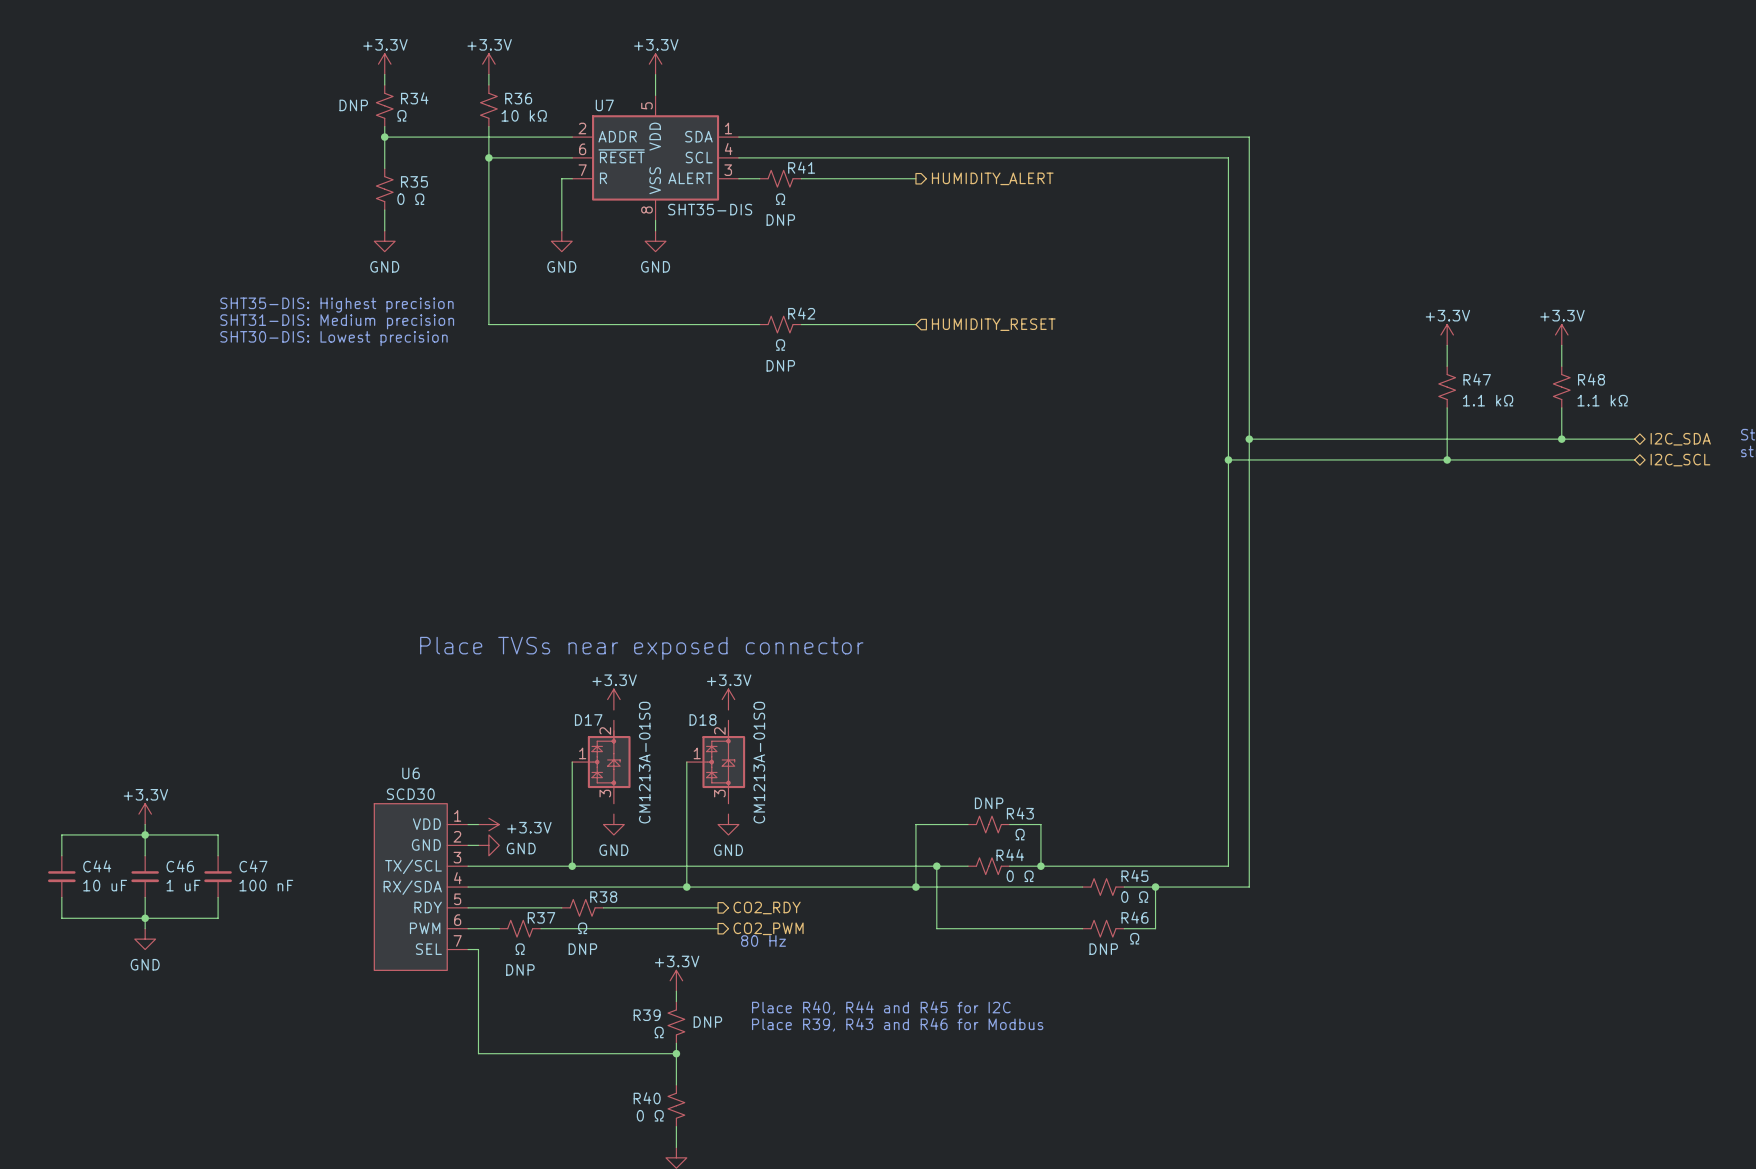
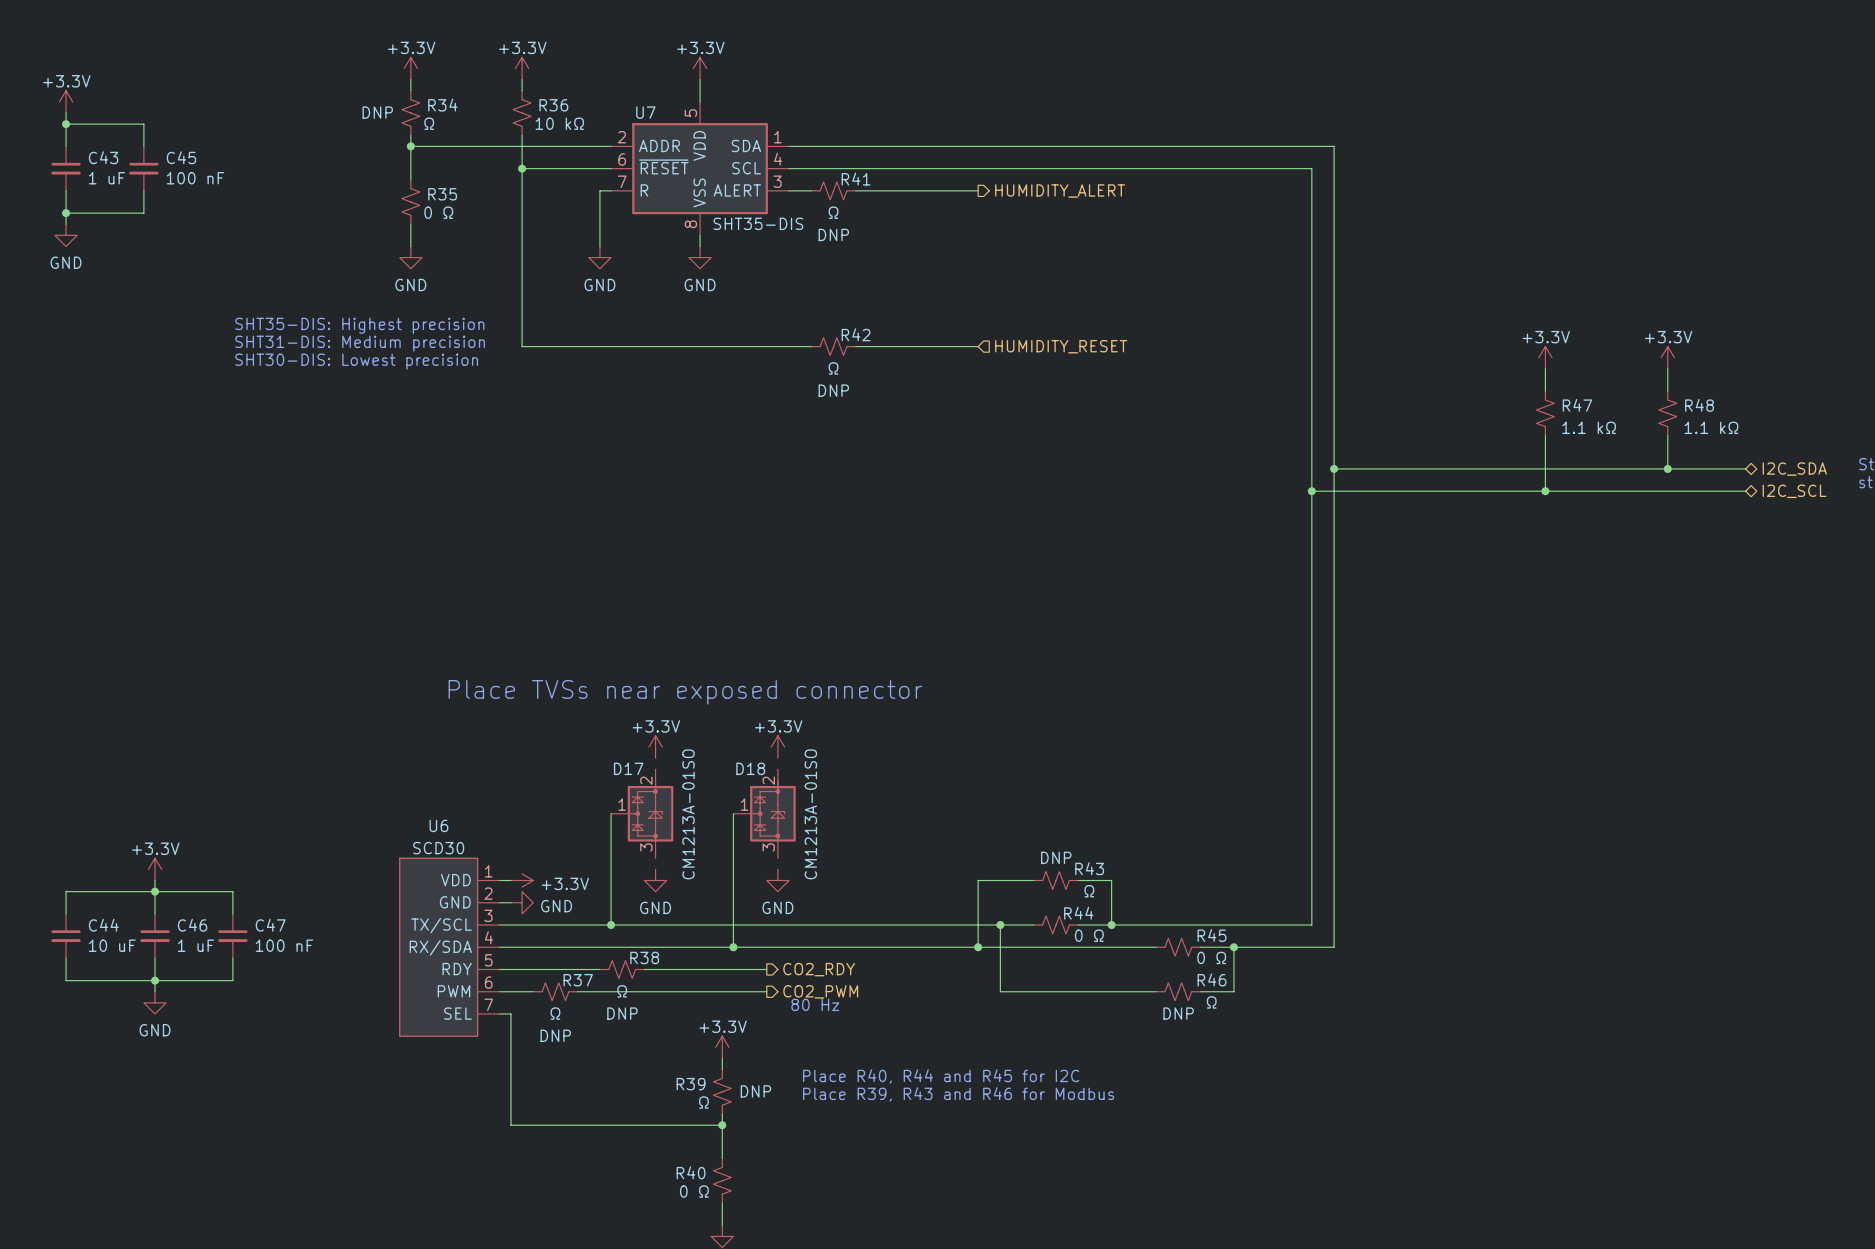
power symbol: none -> +3.3V (66, 101)
wire: none -> (66, 113) (66, 146)
wire: none -> (66, 124) (143, 124) (143, 146)
junction: none -> (66, 124)
C43: none -> 1 uF (66, 168)
C45: none -> 100 nF (143, 168)
wire: none -> (66, 190) (66, 224)
wire: none -> (143, 190) (143, 213) (66, 213)
junction: none -> (66, 213)
power symbol: none -> GND (66, 235)

